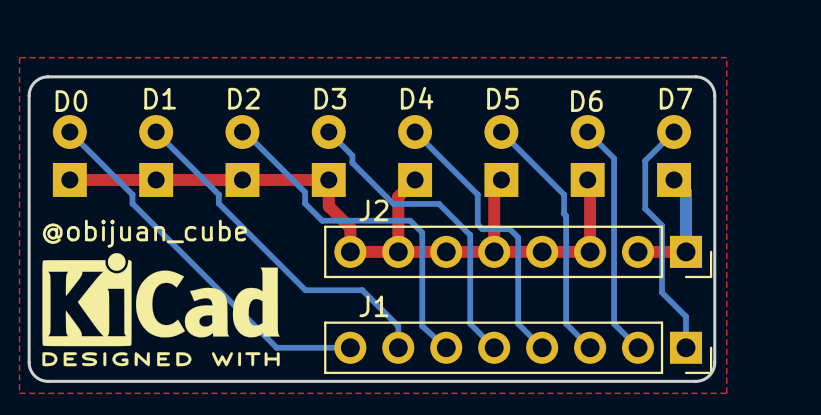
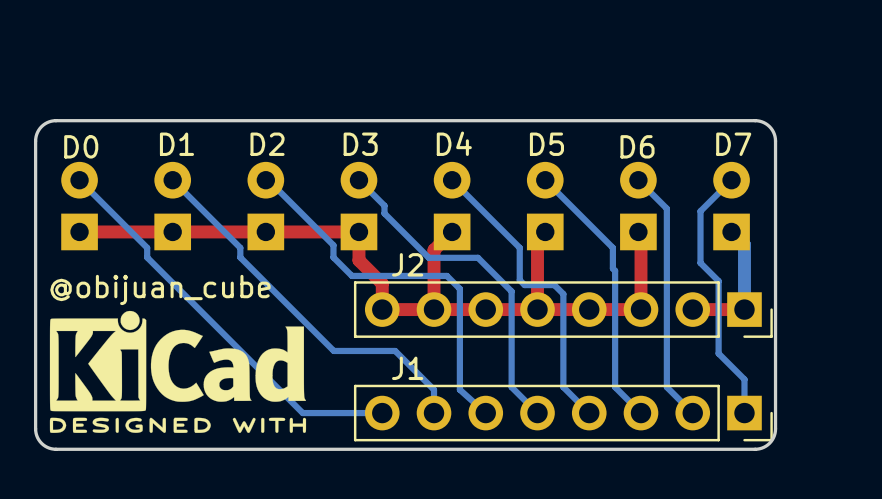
top zone outline: (726, 57) (19, 57) (19, 393) (726, 393) (726, 57) -> none

